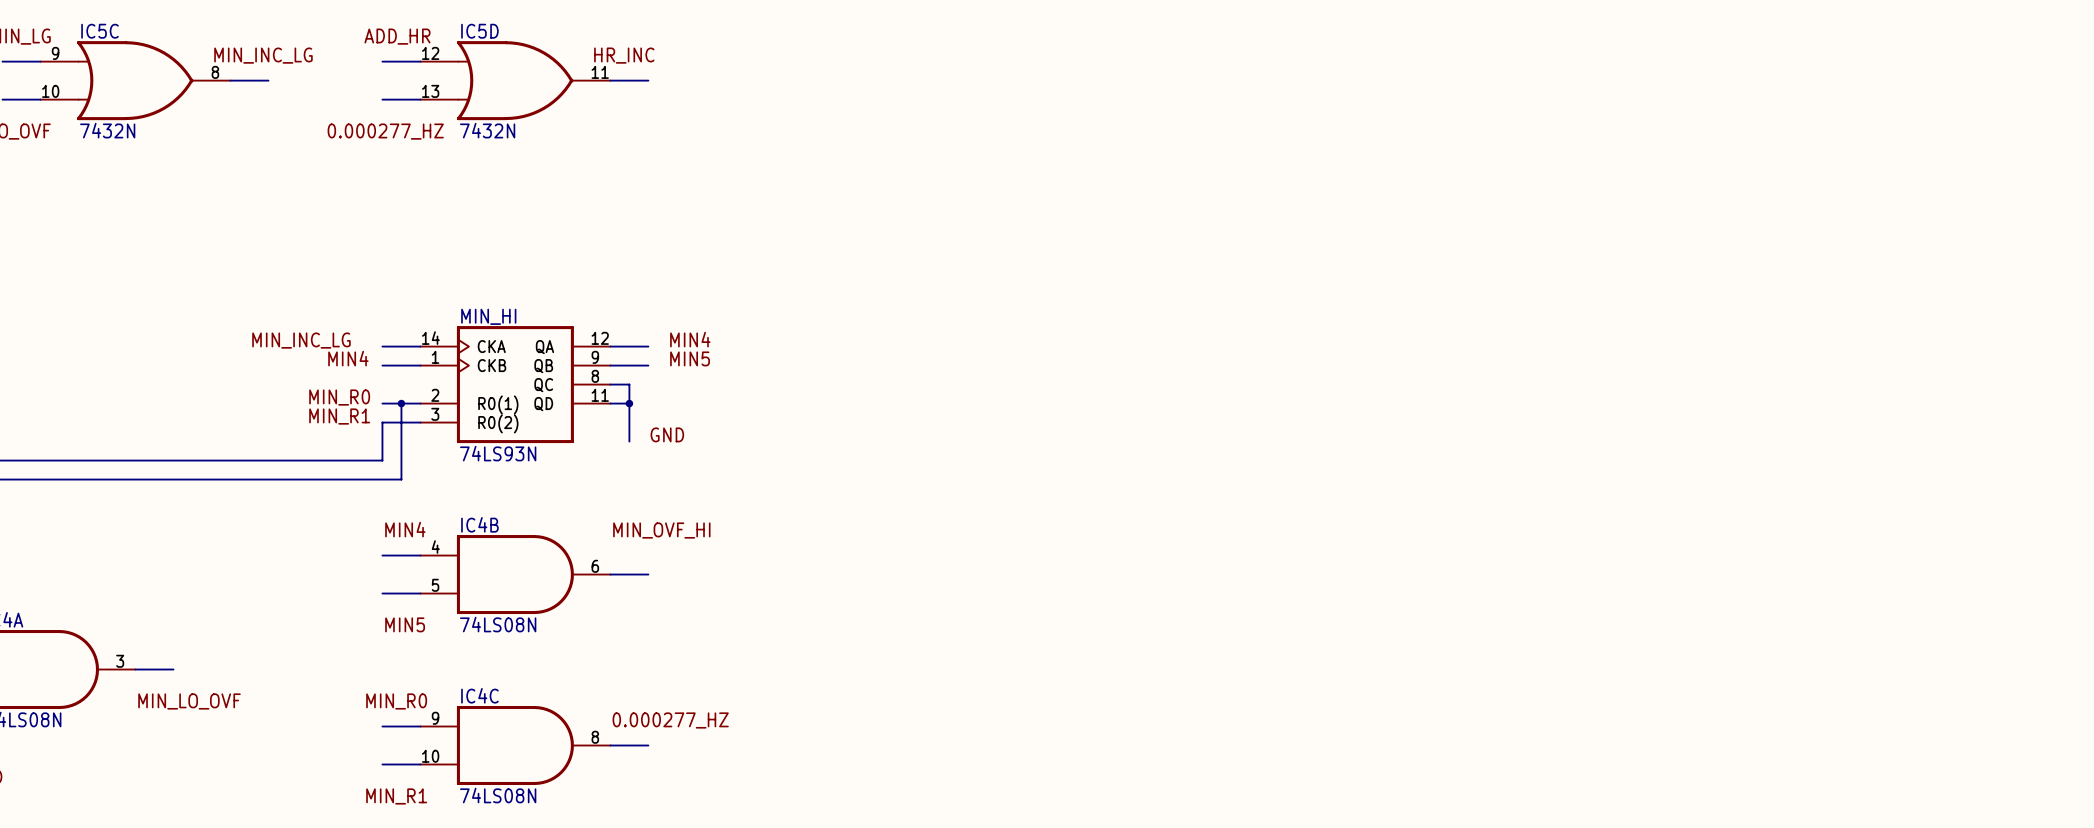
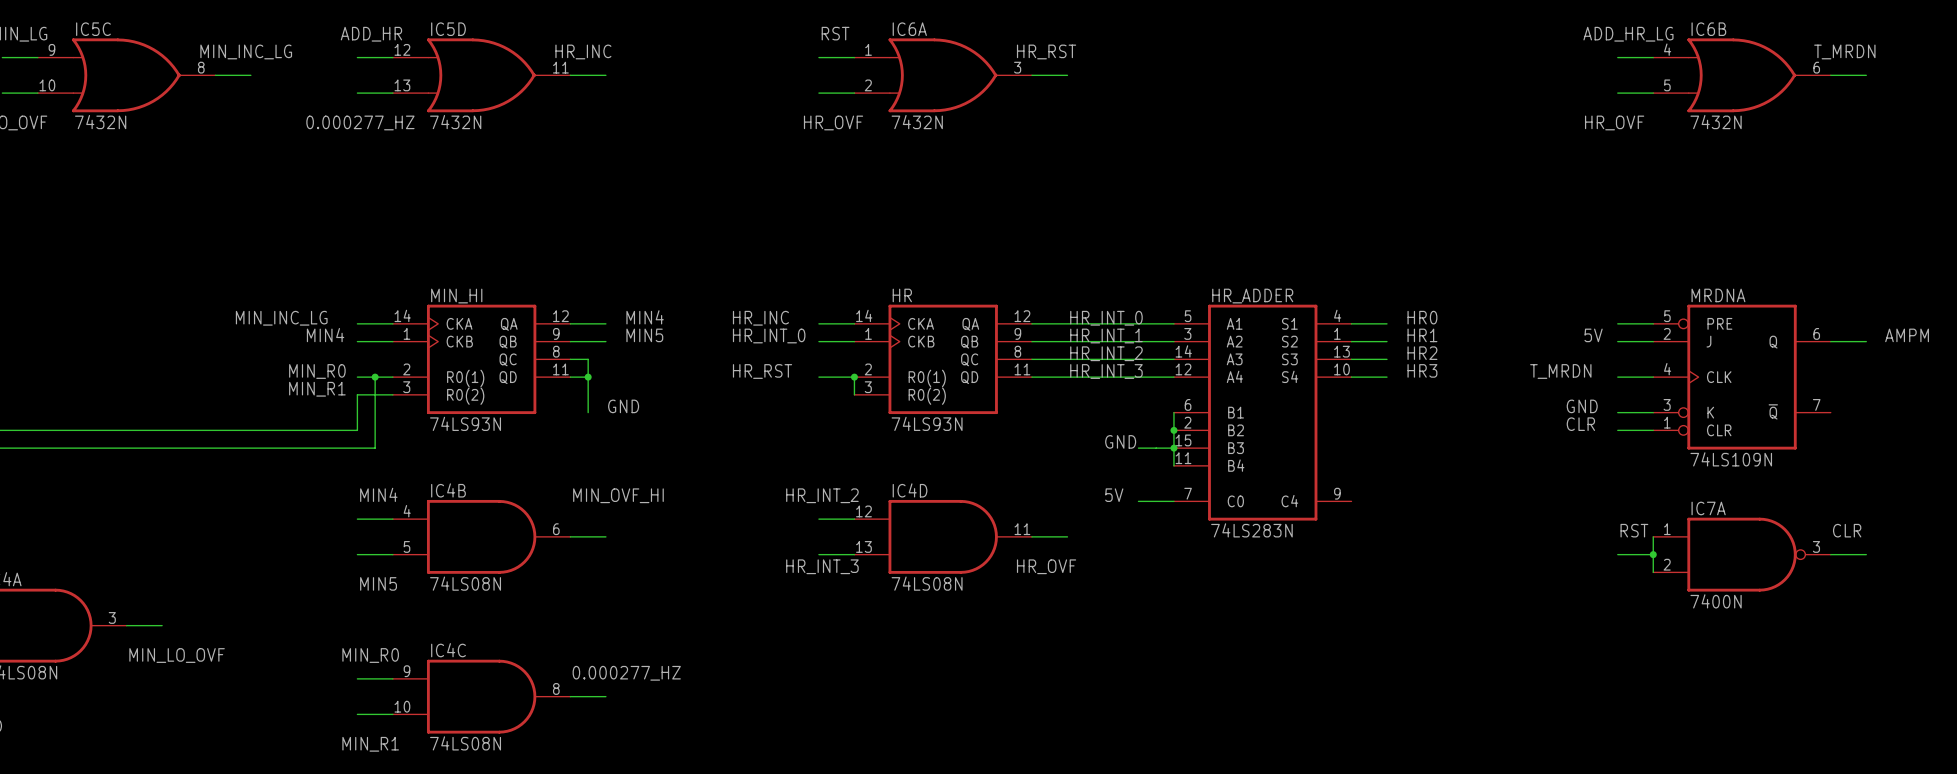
label: none -> RST (835, 33)
label: none -> ADD_HR_LG (1628, 34)
label: none -> HR_RST (1046, 51)
label: none -> T_MRDN (1844, 51)
wire: none -> (818, 57) (854, 57)
wire: none -> (1617, 57) (1653, 57)
IC6A: none -> 7432N (943, 75)
wire: none -> (1031, 75) (1067, 75)
IC6B: none -> 7432N (1742, 75)
wire: none -> (1830, 75) (1866, 75)
wire: none -> (818, 93) (854, 93)
wire: none -> (1617, 93) (1653, 93)
label: none -> HR_OVF (833, 122)
label: none -> HR_OVF (1614, 122)
label: none -> HR0 (1422, 317)
label: none -> HR_INC (760, 318)
label: none -> HR_INT_0 (1106, 318)
wire: none -> (818, 323) (854, 323)
wire: none -> (1031, 323) (1173, 323)
wire: none -> (1351, 323) (1386, 323)
wire: none -> (1617, 323) (1653, 323)
label: none -> HR1 (1422, 335)
label: none -> 5V (1593, 335)
label: none -> AMPM (1907, 335)
label: none -> HR_INT_0 (769, 335)
label: none -> HR_INT_1 (1106, 335)
wire: none -> (818, 341) (854, 341)
wire: none -> (1031, 341) (1173, 341)
wire: none -> (1351, 341) (1386, 341)
wire: none -> (1617, 341) (1653, 341)
wire: none -> (1830, 341) (1866, 341)
label: none -> HR2 (1422, 353)
label: none -> HR_INT_2 (1106, 353)
HR: none -> 74LS93N (943, 359)
wire: none -> (1031, 359) (1173, 359)
wire: none -> (1351, 359) (1386, 359)
label: none -> HR3 (1422, 370)
label: none -> HR_RST (762, 371)
label: none -> HR_INT_3 (1106, 371)
label: none -> T_MRDN (1560, 371)
wire: none -> (818, 377) (854, 377) (854, 394)
junction: none -> (854, 377)
wire: none -> (1031, 377) (1173, 377)
wire: none -> (1351, 377) (1386, 377)
wire: none -> (1617, 377) (1653, 377)
MRDNA: none -> 74LS109N (1742, 377)
label: none -> GND (1582, 406)
wire: none -> (1173, 412) (1173, 465)
HR_ADDER: none -> 74LS283N (1262, 412)
wire: none -> (1617, 412) (1653, 412)
label: none -> CLR (1580, 424)
junction: none -> (1173, 430)
wire: none -> (1617, 430) (1653, 430)
label: none -> GND (1120, 441)
wire: none -> (1138, 448) (1173, 448)
junction: none -> (1173, 448)
label: none -> 5V (1114, 495)
label: none -> HR_INT_2 (822, 495)
wire: none -> (1138, 501) (1173, 501)
wire: none -> (818, 519) (854, 519)
label: none -> RST (1634, 530)
label: none -> CLR (1847, 530)
IC4D: none -> 74LS08N (943, 536)
wire: none -> (1031, 536) (1067, 536)
wire: none -> (1653, 536) (1653, 572)
wire: none -> (818, 554) (854, 554)
wire: none -> (1617, 554) (1653, 554)
junction: none -> (1653, 554)
IC7A: none -> 7400N (1742, 554)
wire: none -> (1830, 554) (1866, 554)
label: none -> HR_INT_3 (822, 566)
label: none -> HR_OVF (1046, 566)

